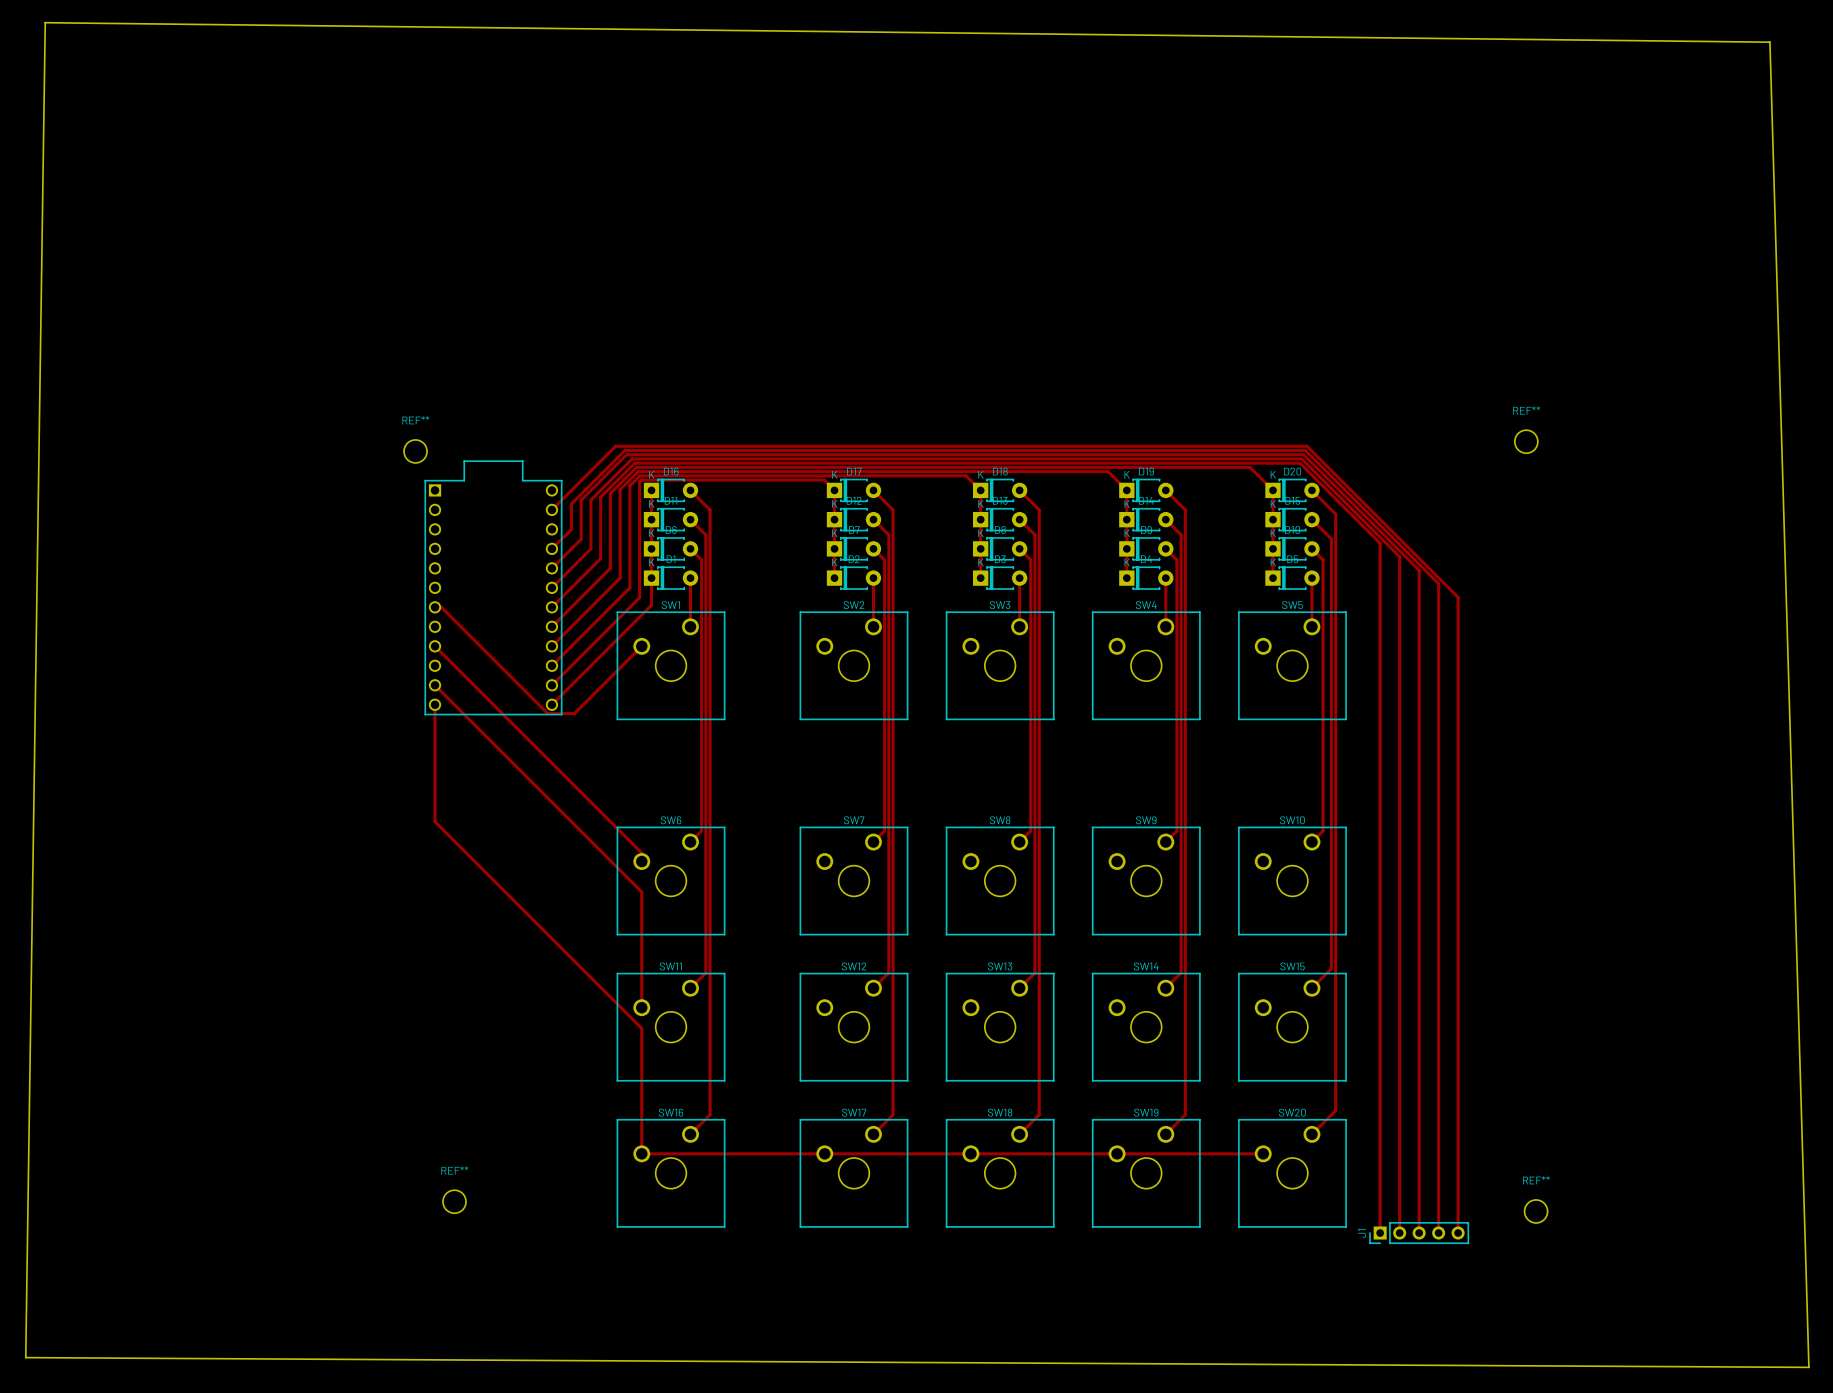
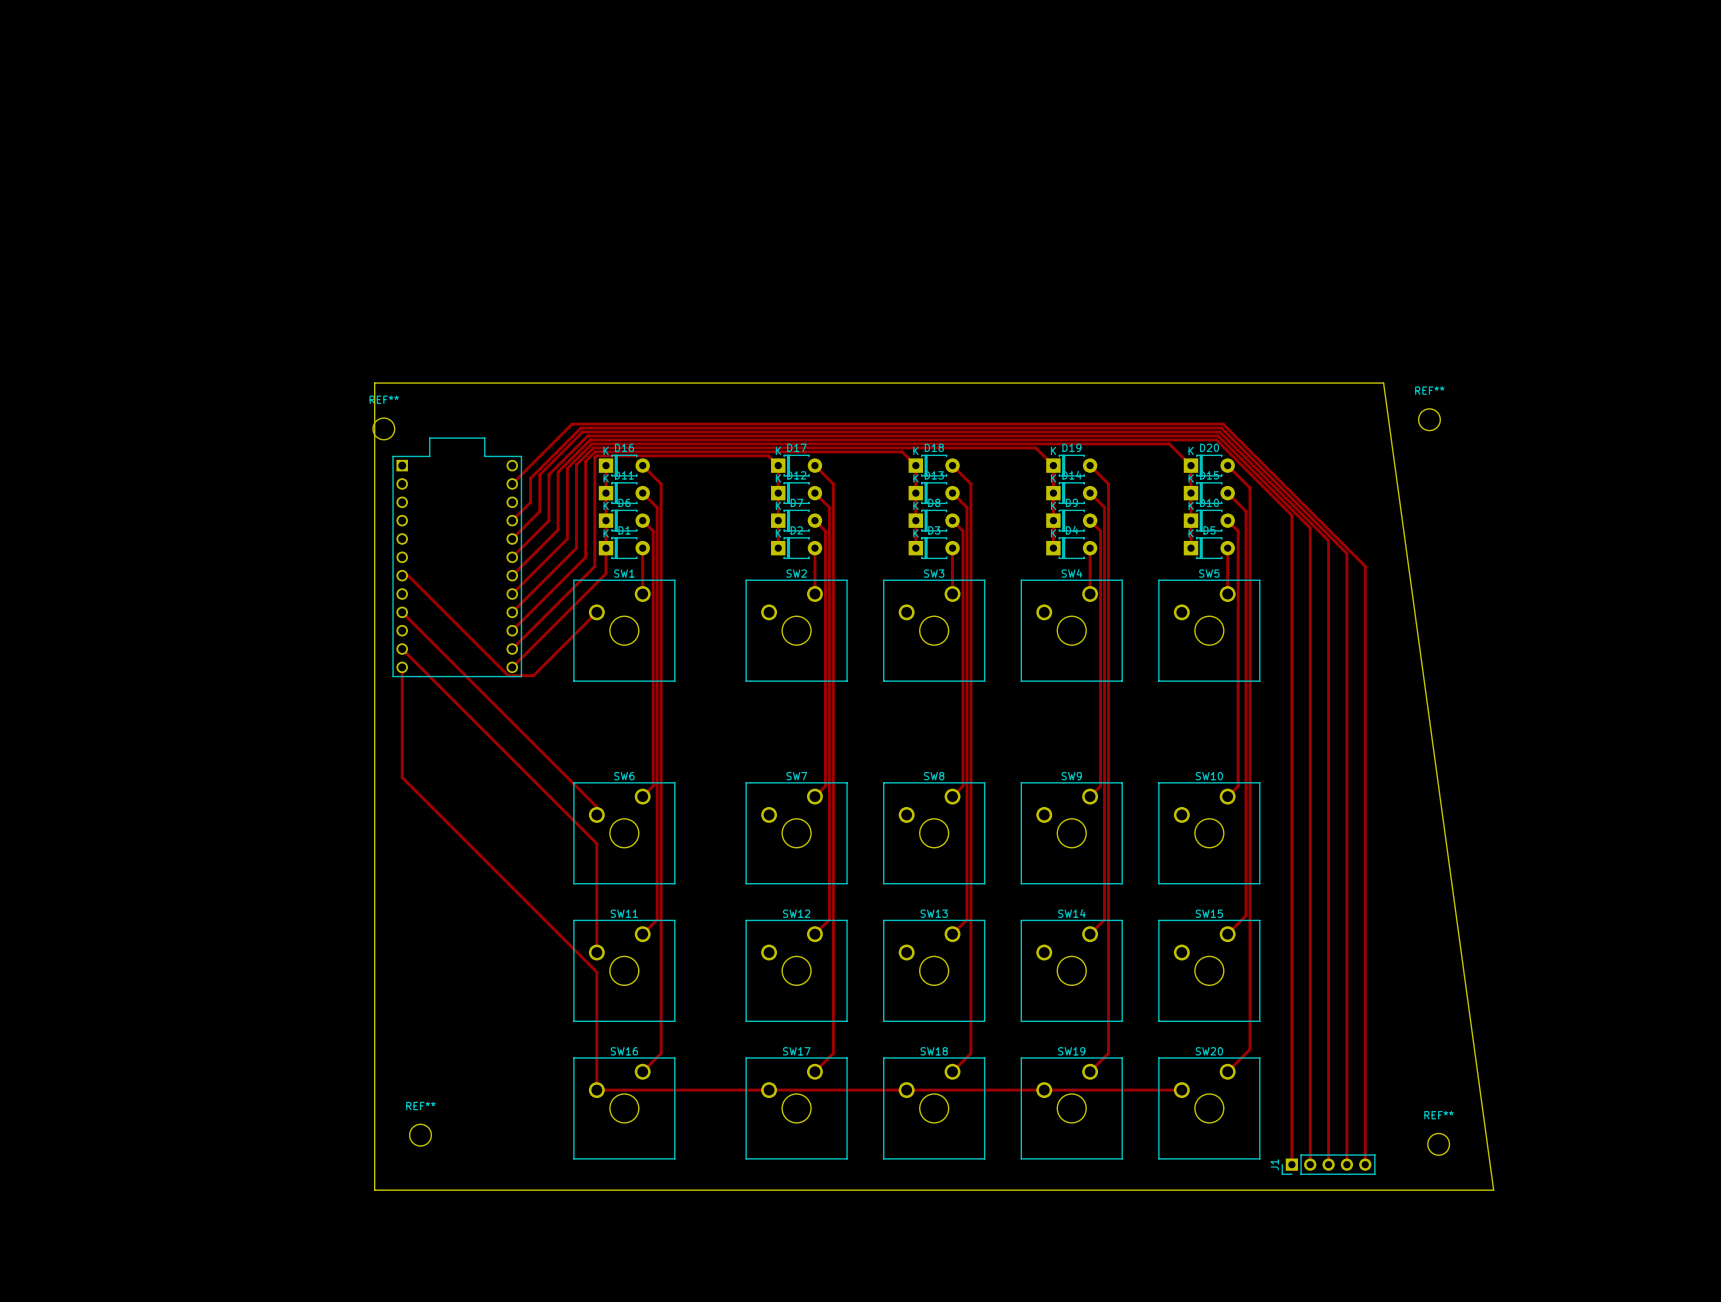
board edge: (45, 22) (1769, 42) (1808, 1367) (25, 1357) (45, 22) -> none
board edge: none -> (374, 383) (1383, 383) (1493, 1190) (374, 1190) (374, 383)

